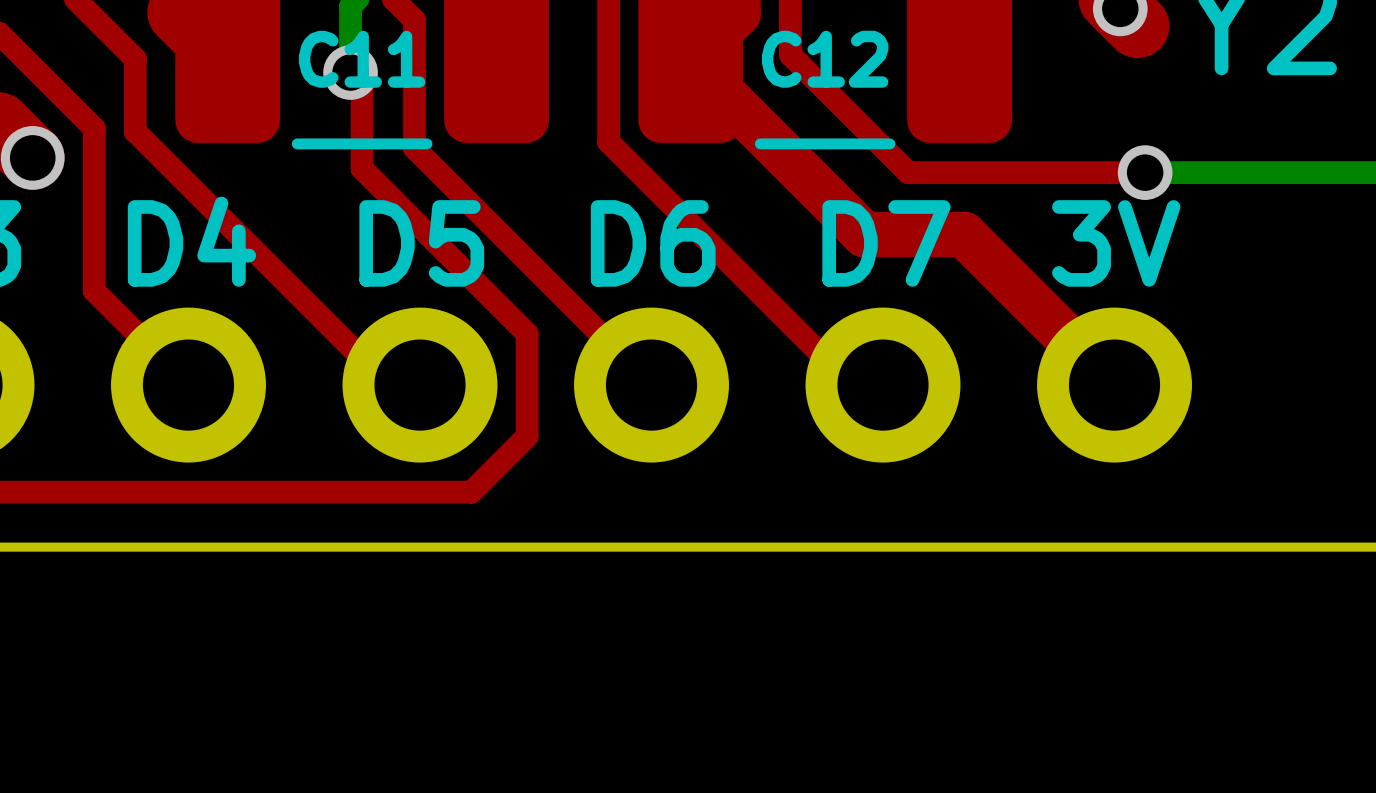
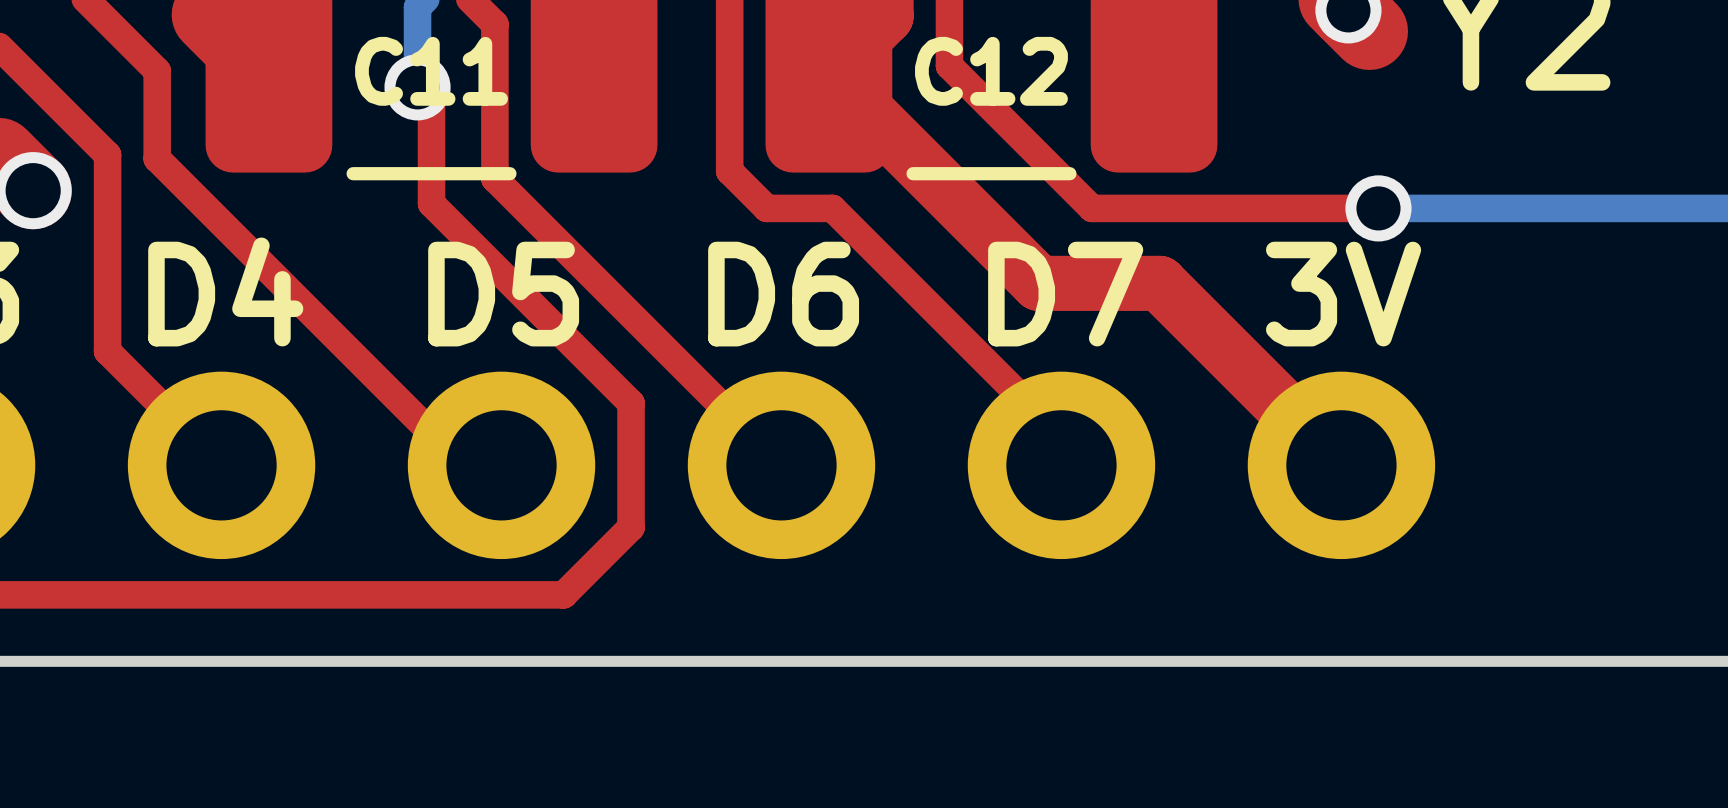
top track: (639, 172) (851, 385) (883, 385) -> (766, 208) (832, 208) (1061, 437) (1061, 465)

